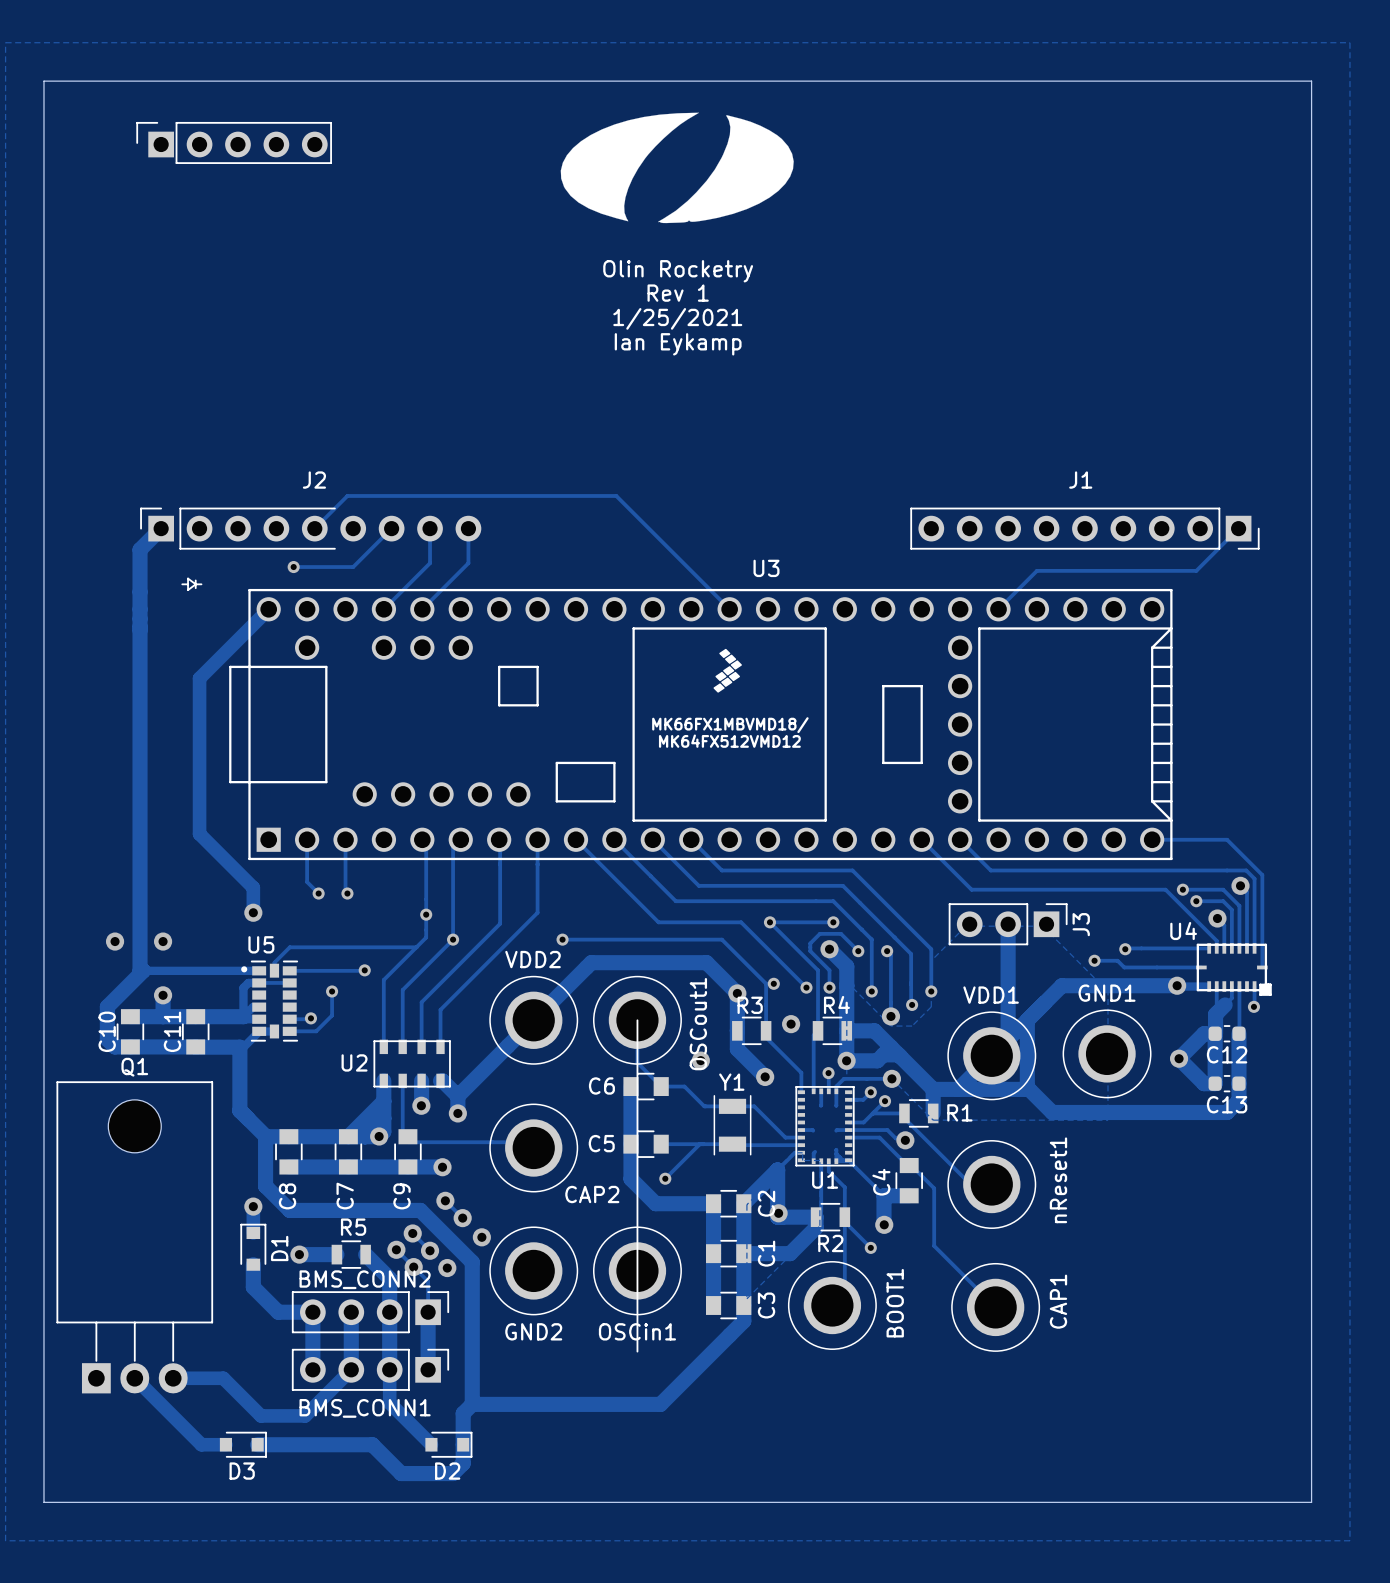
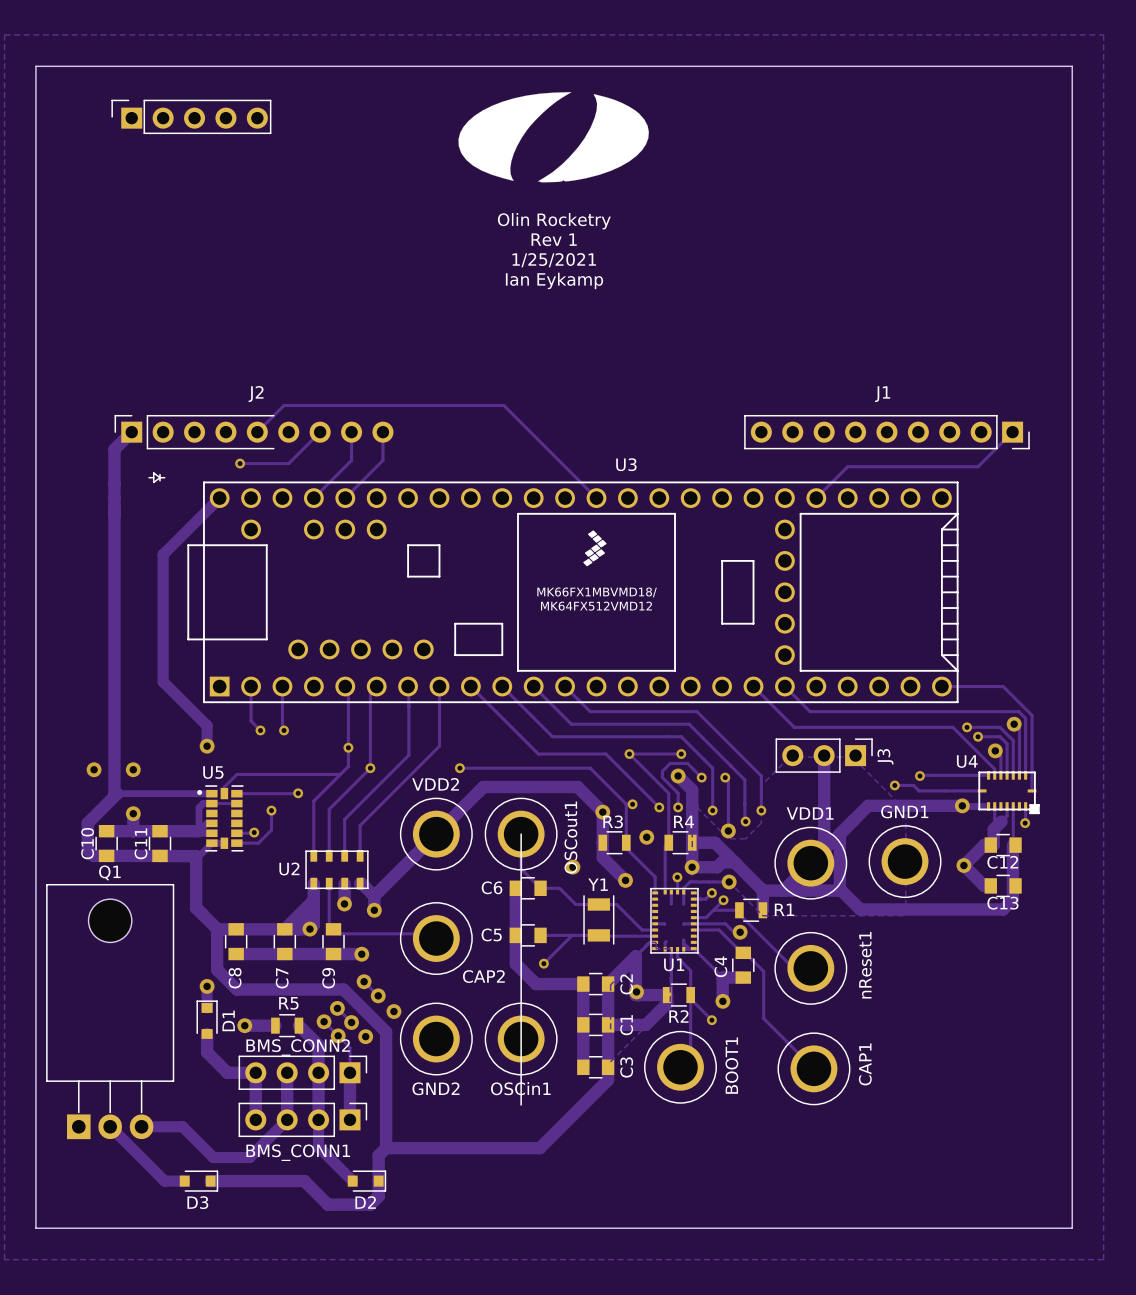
C12 footprint: [1208, 1025, 1246, 1043] -> [984, 833, 1022, 857]
track: (1215, 1033) (1215, 1083) (1211, 1083) -> none
C13 footprint: [1208, 1075, 1246, 1093] -> [984, 874, 1022, 898]

